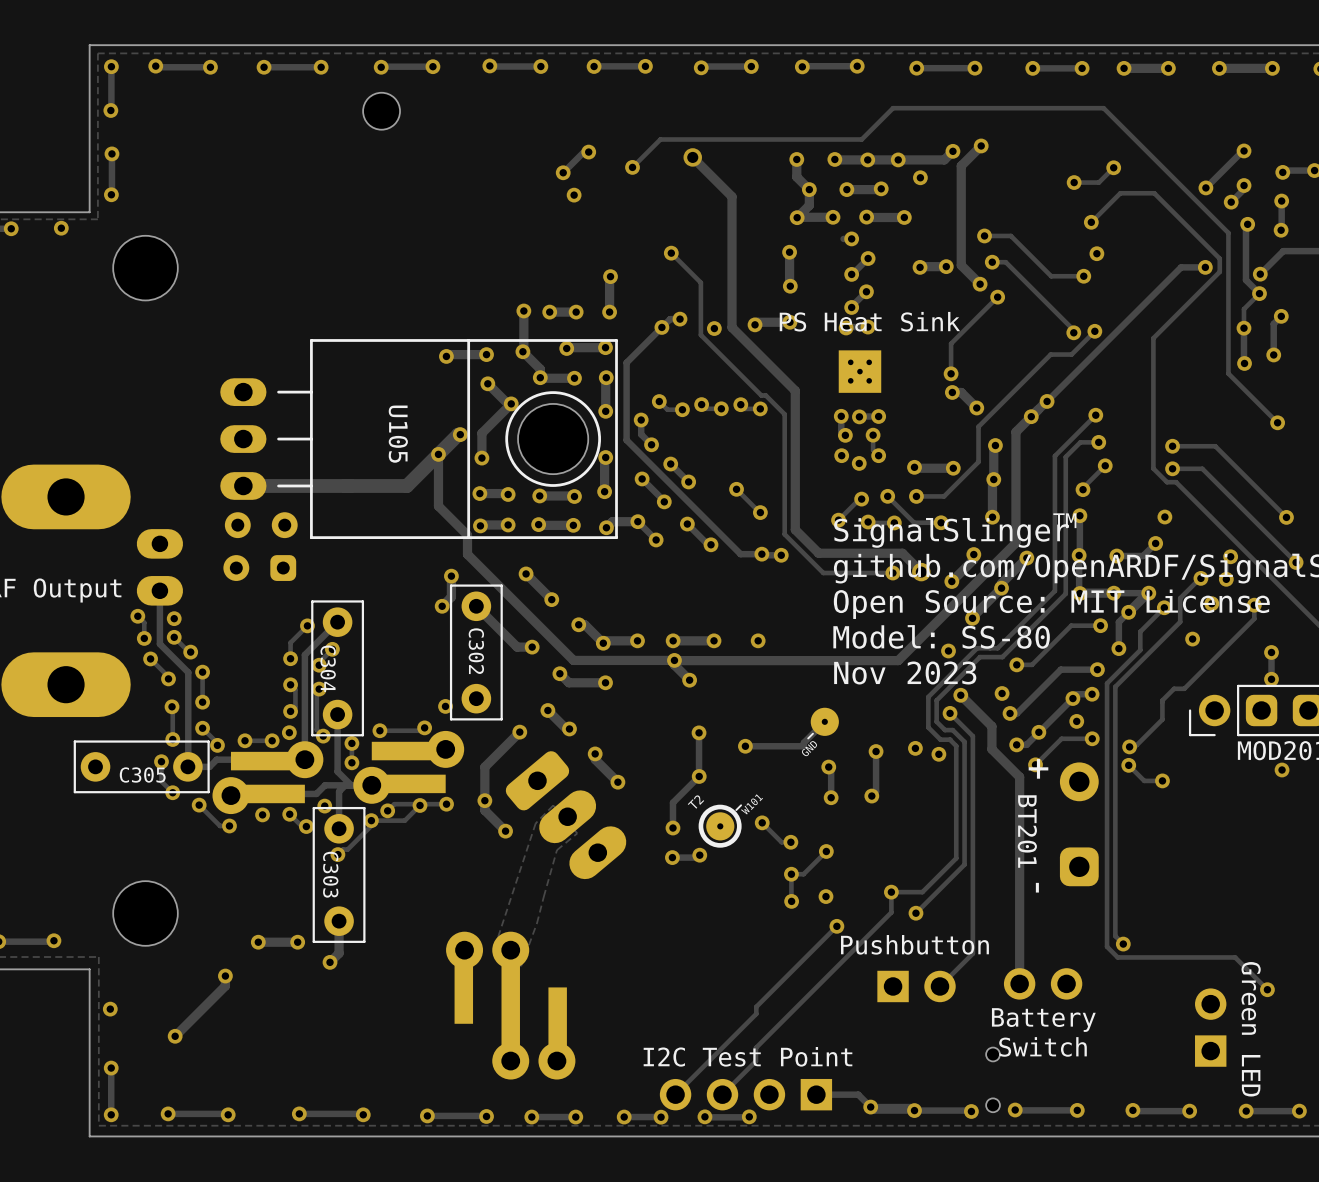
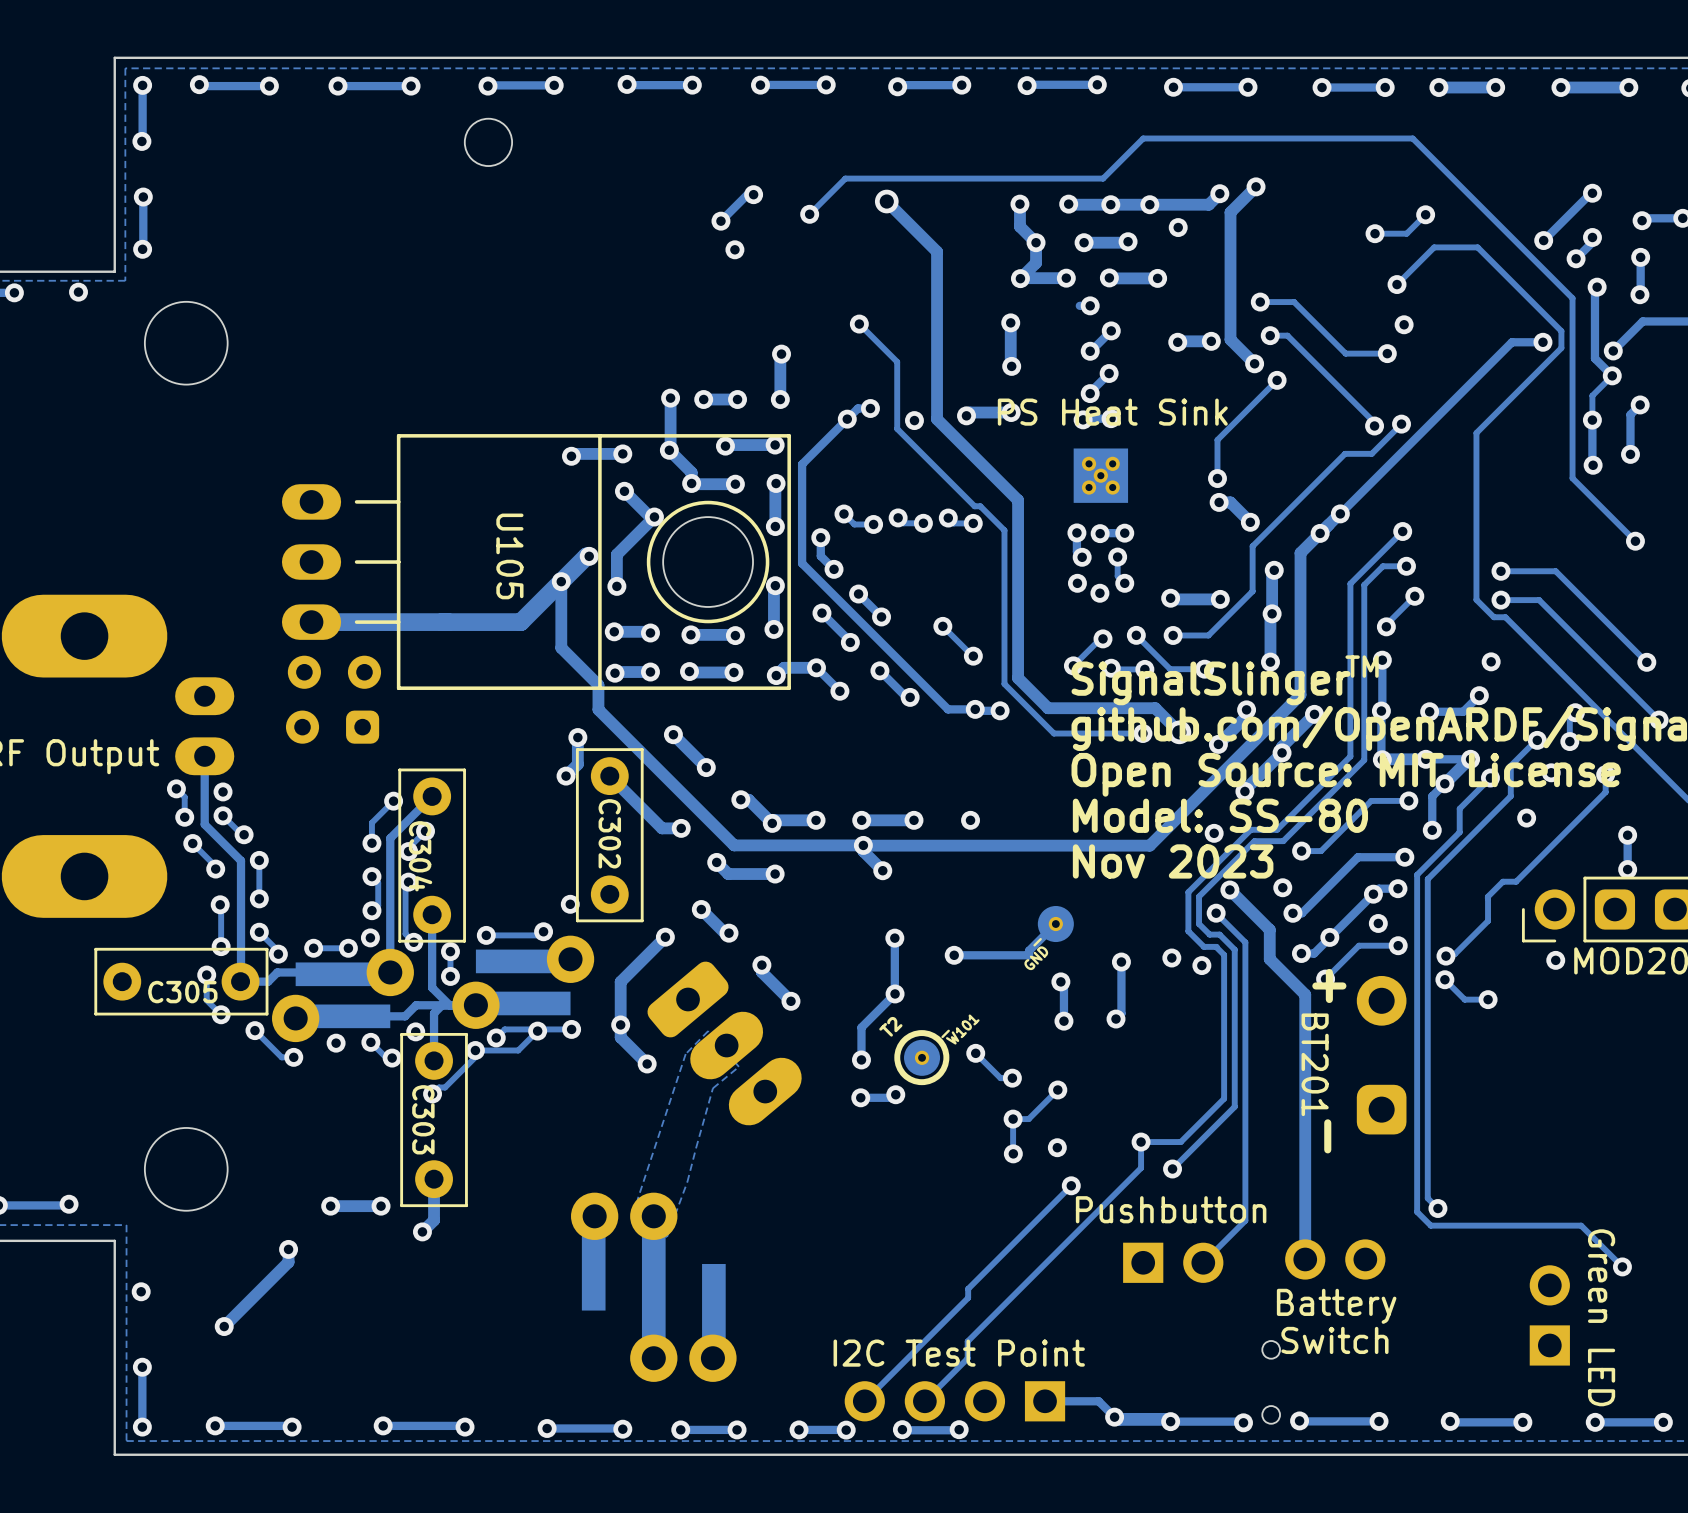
via: none -> (1555, 960)
via: (1282, 770) -> none

